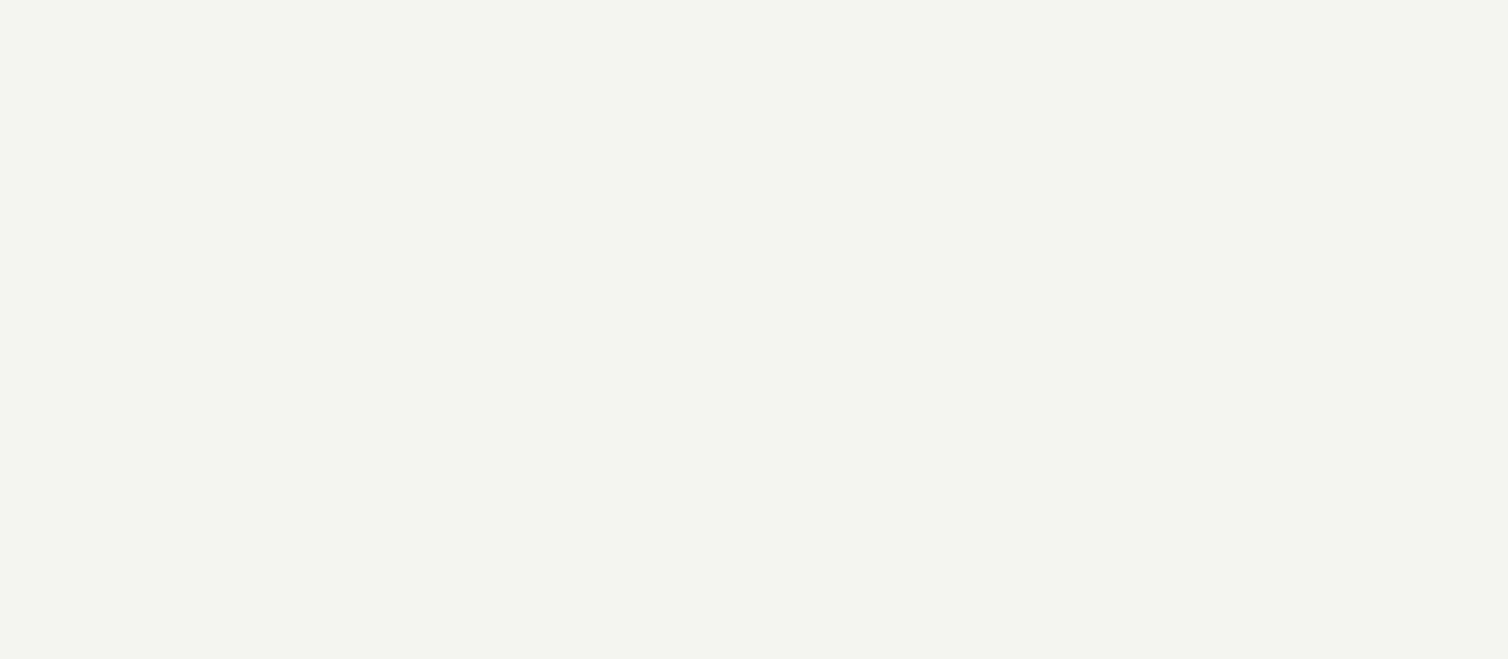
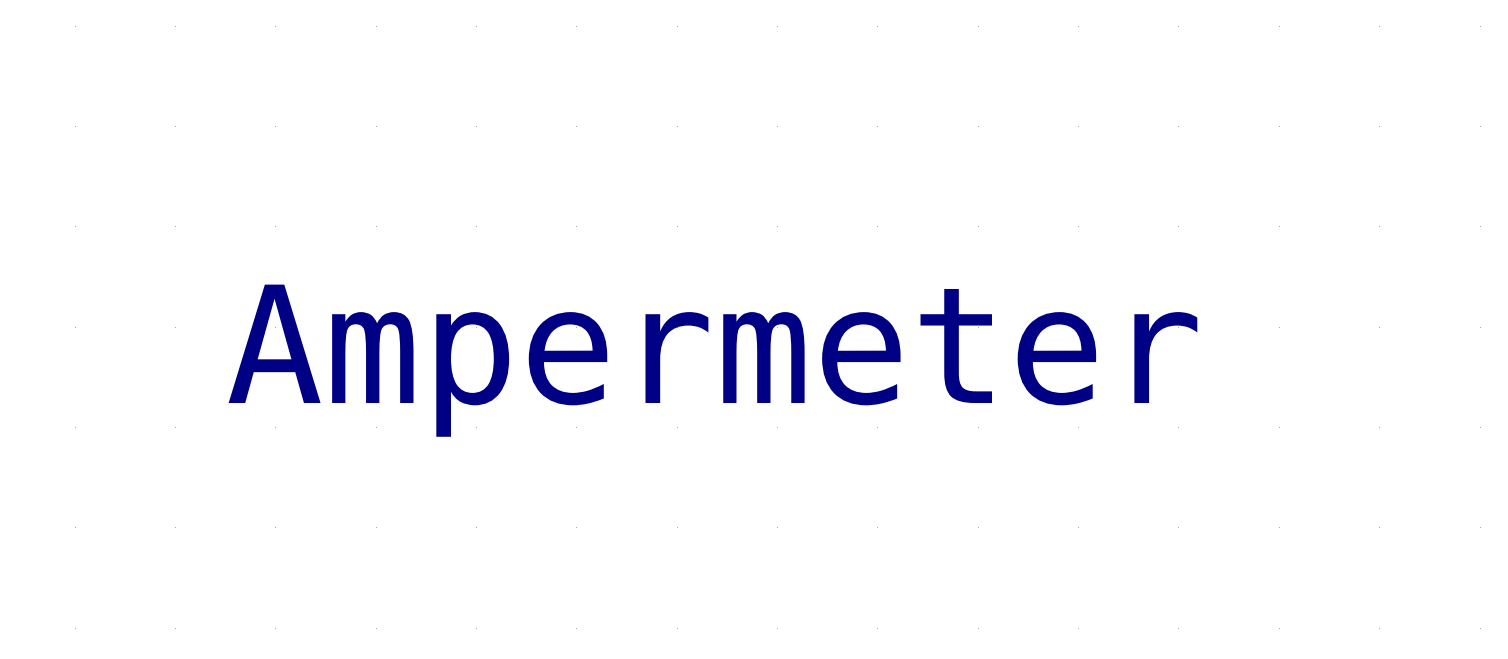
text: none -> Ampermeter (712, 360)

